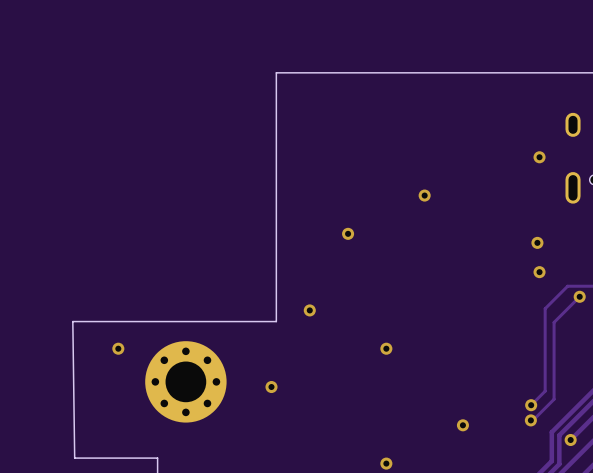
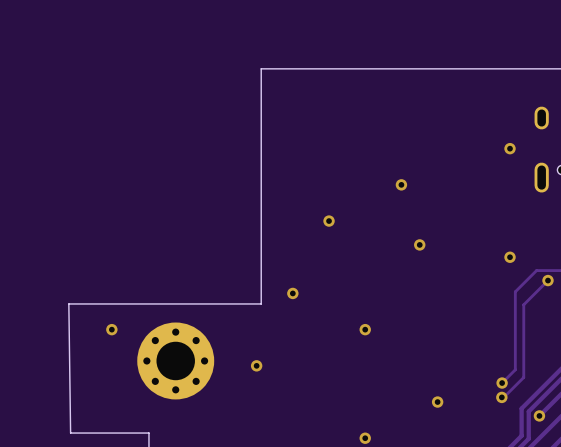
via: (537, 242) -> none
via: none -> (419, 244)

